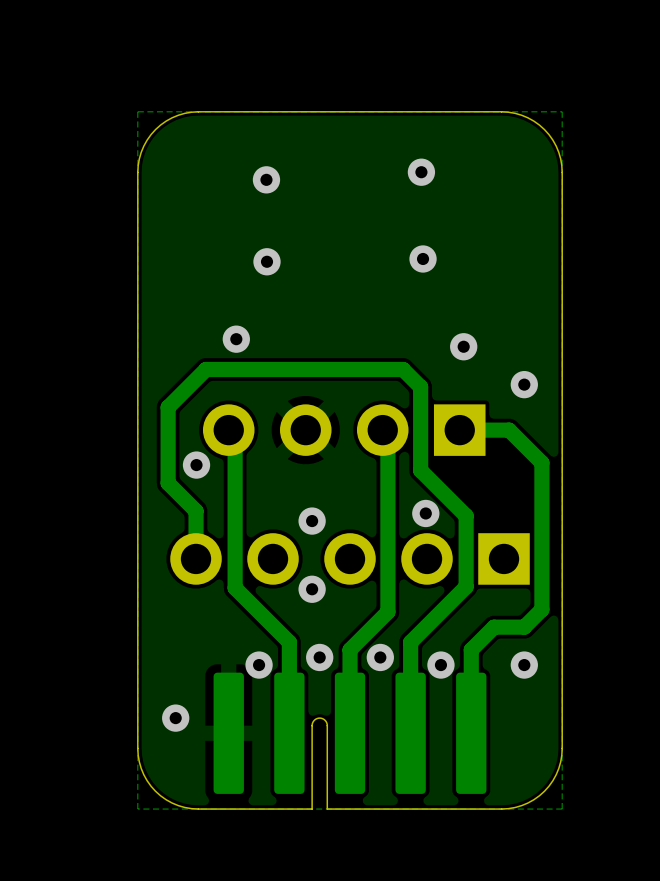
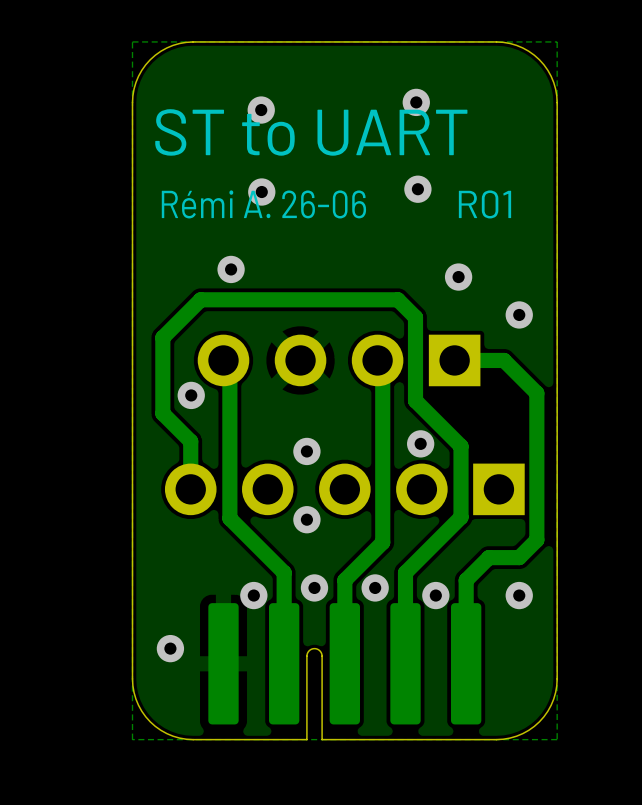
text: none -> ST to UART (311, 132)
text: none -> Rémi A. 26-06 (263, 204)
text: none -> R01 (484, 204)

